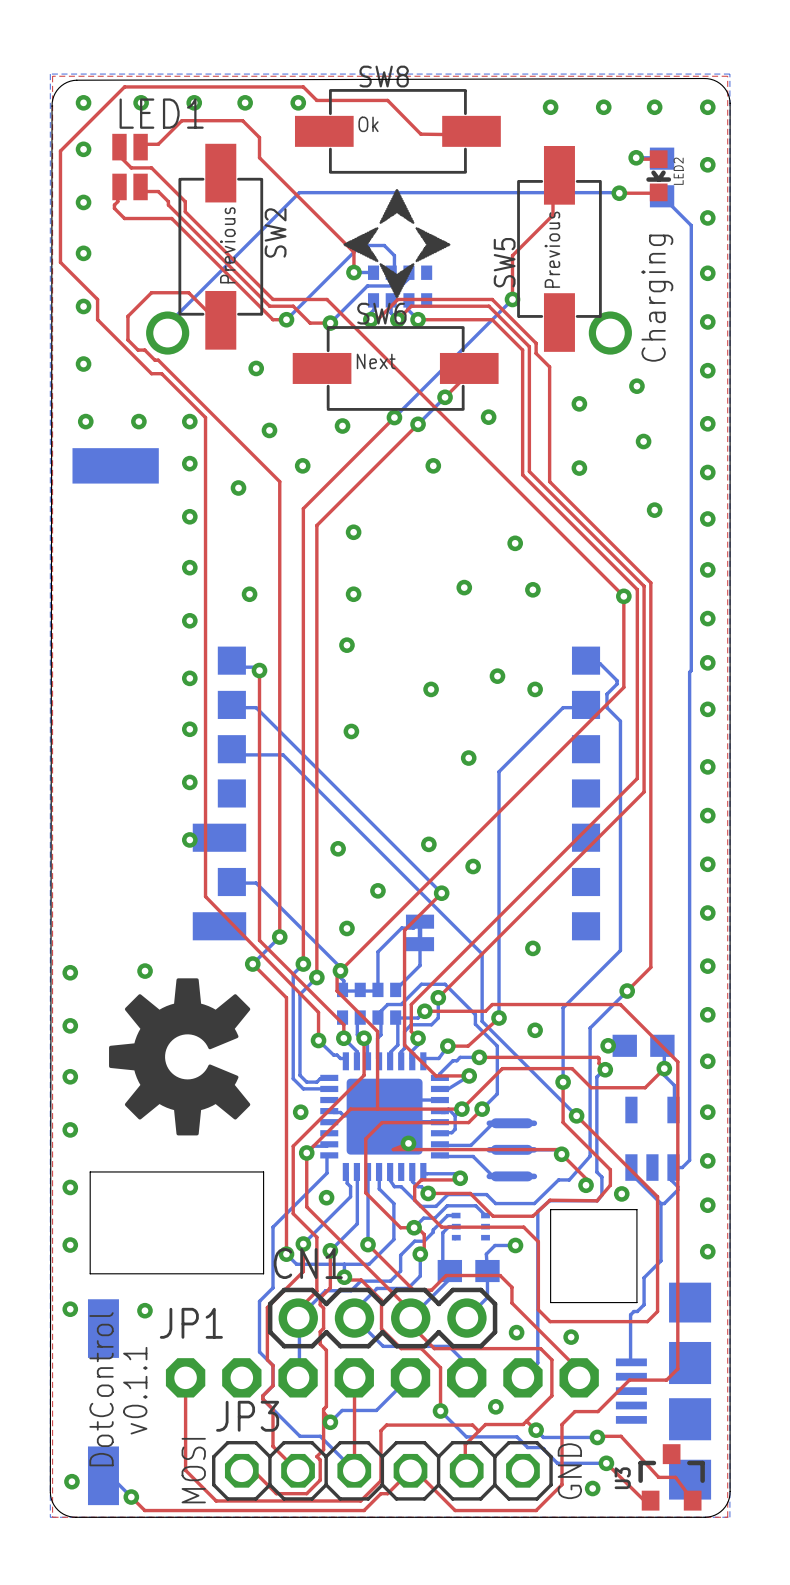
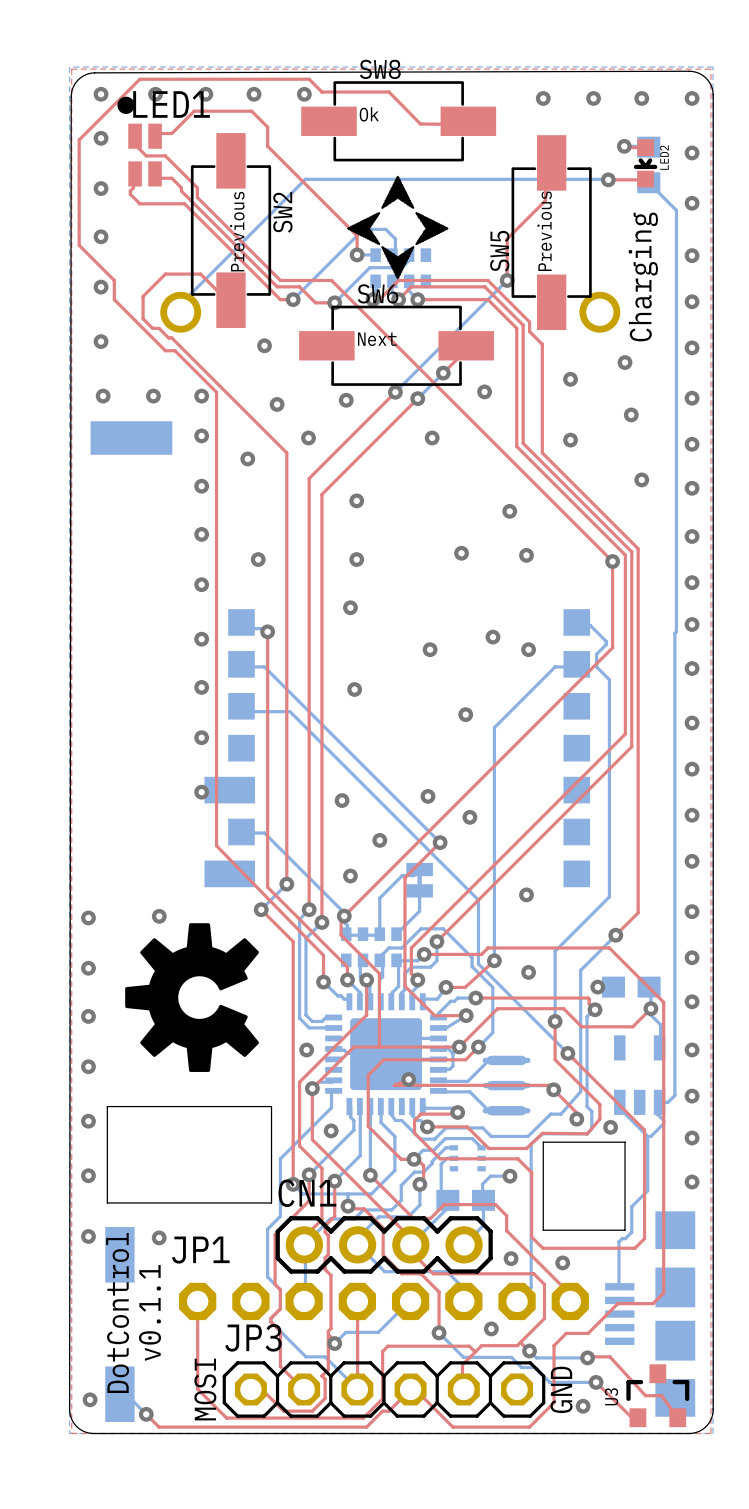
drawing: none -> [117, 96, 135, 114]

